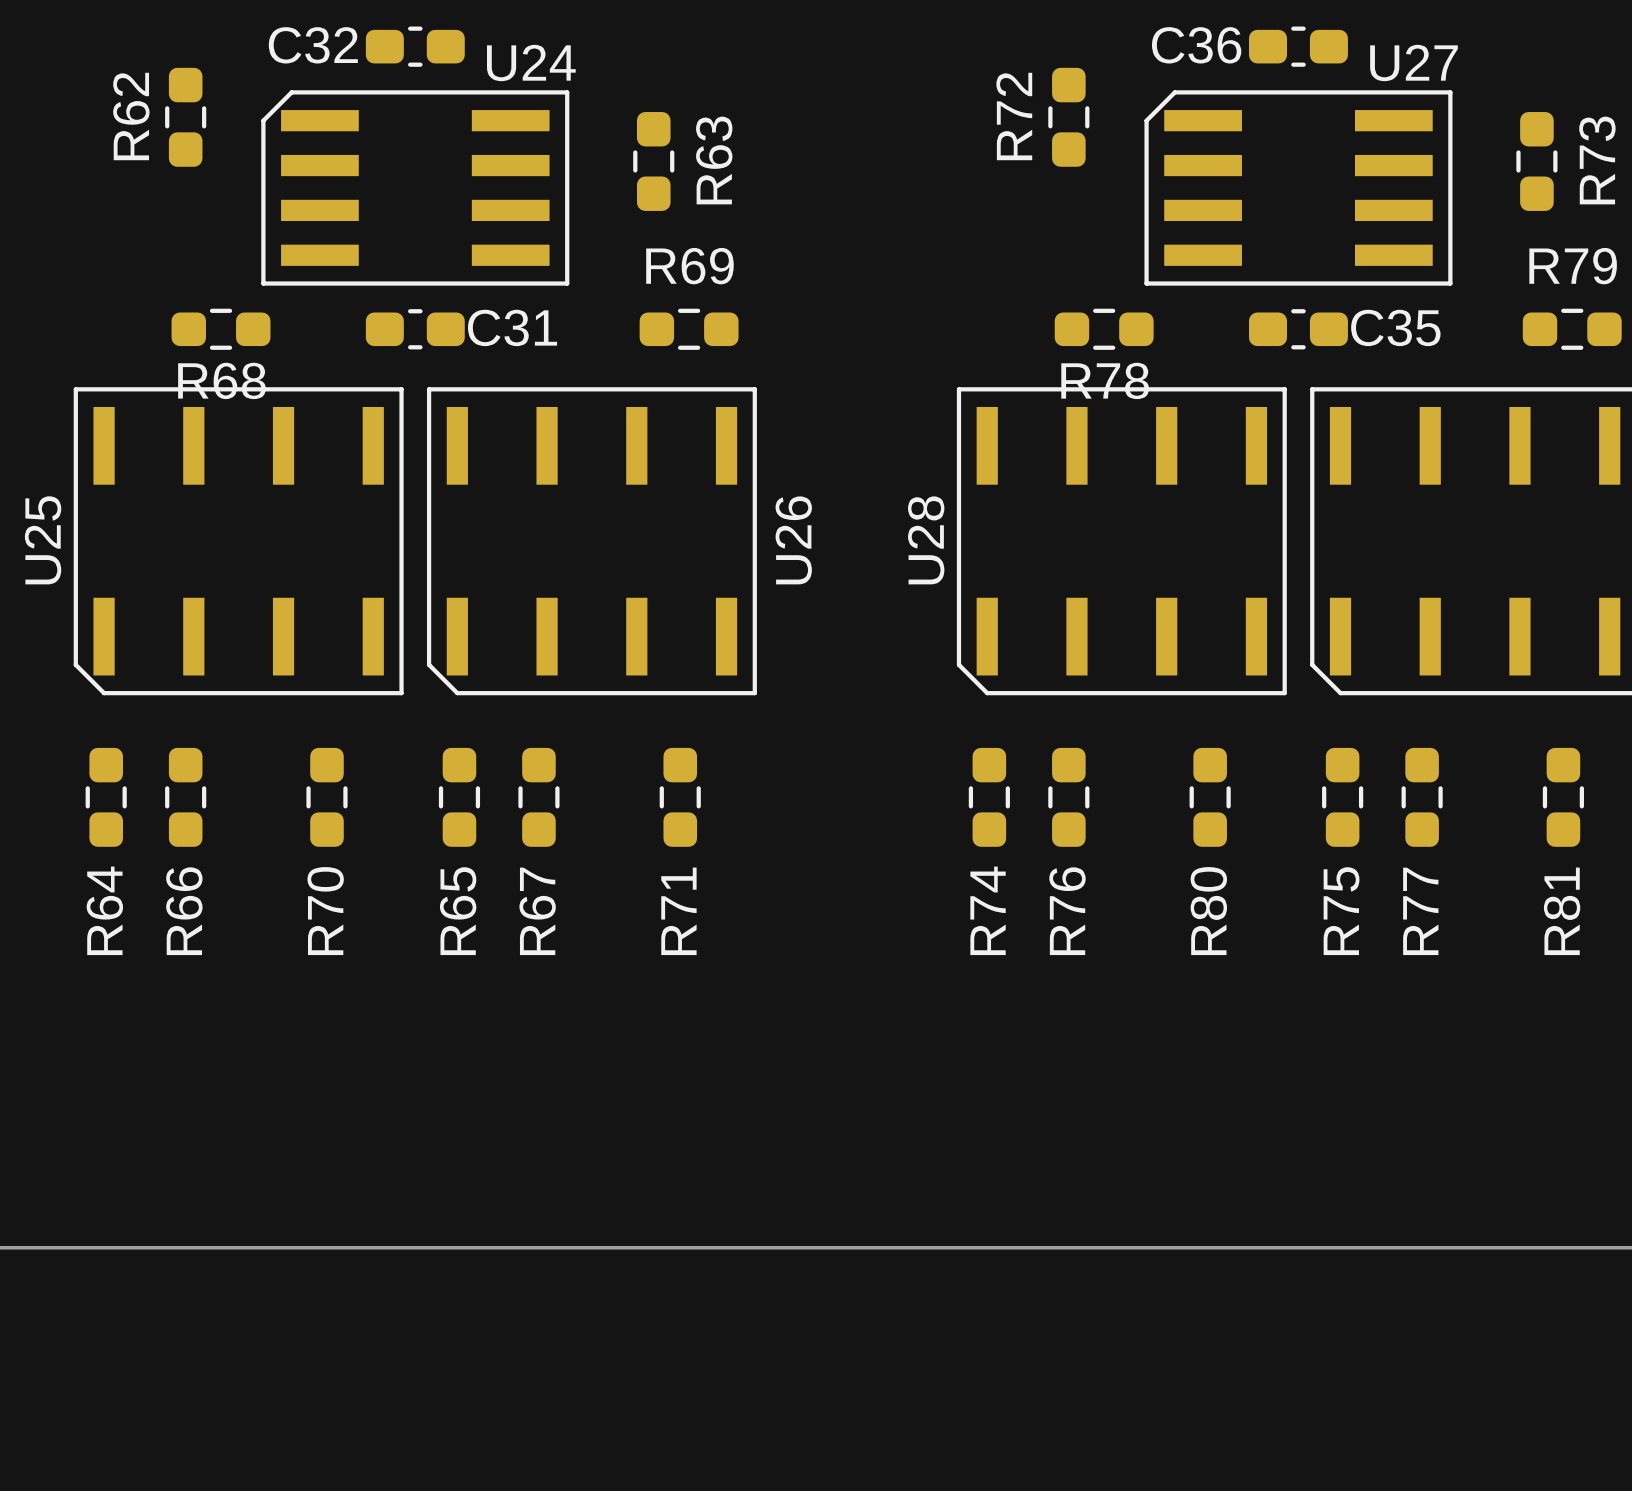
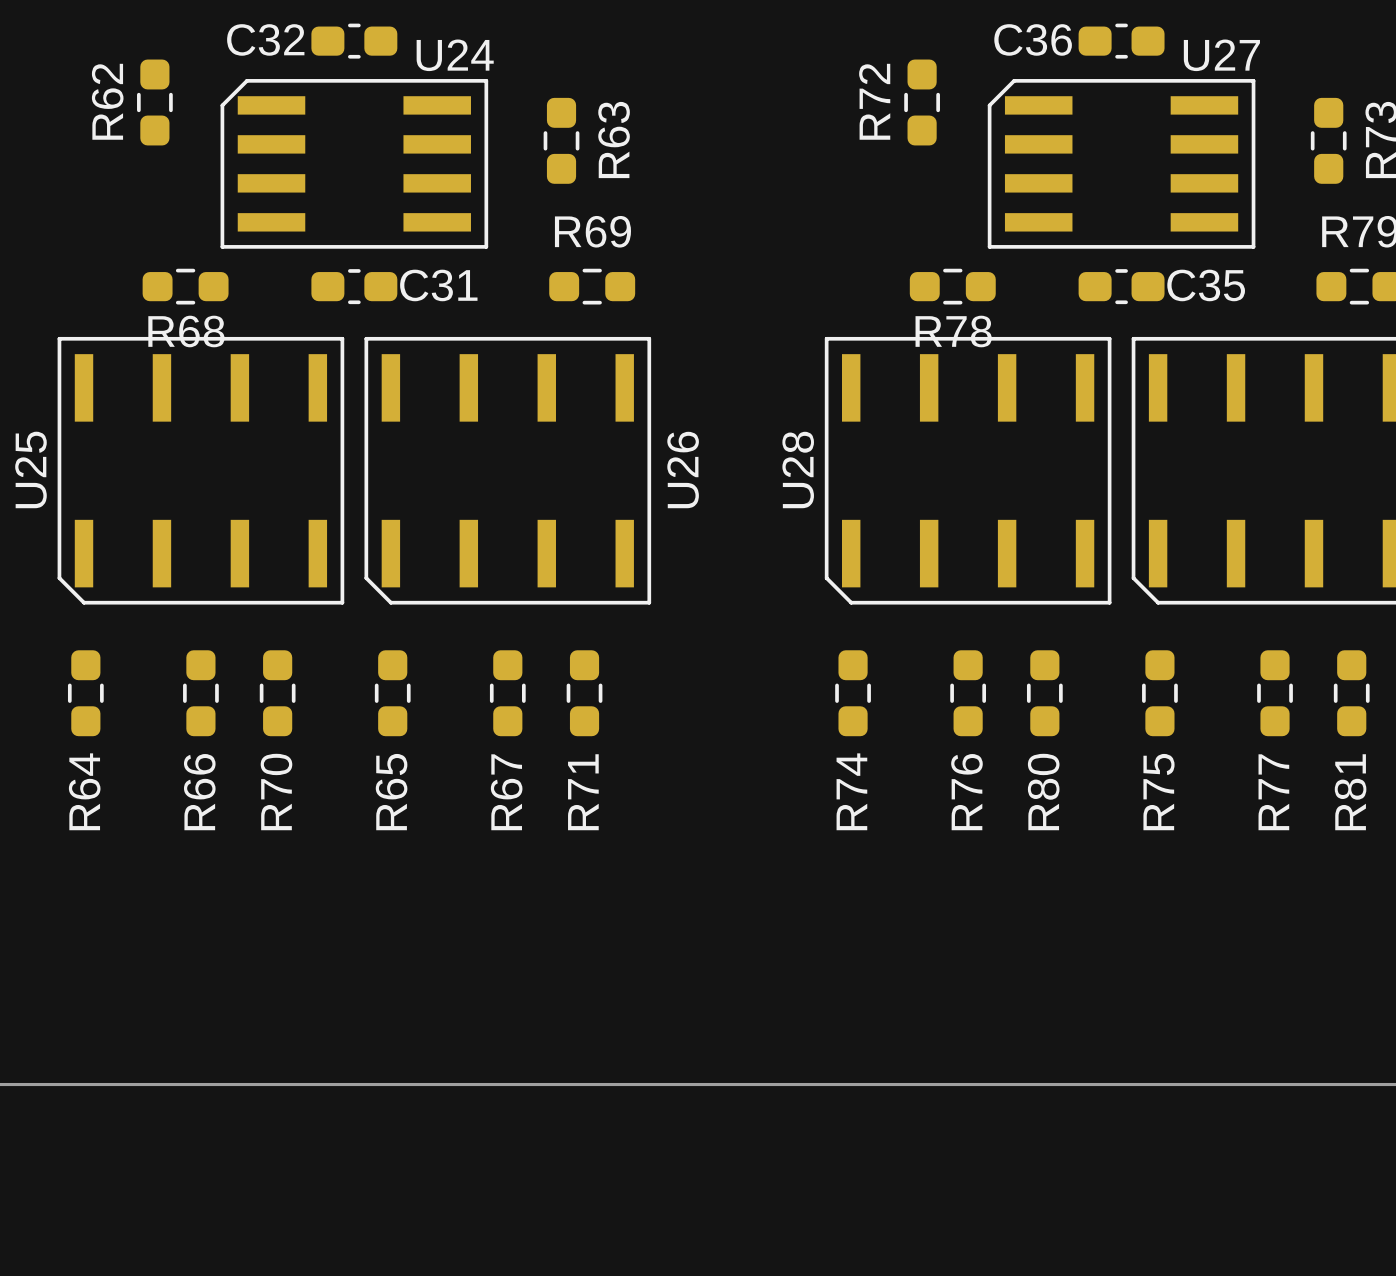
R66 position: (185, 797) -> (200, 693)
R67 position: (538, 797) -> (507, 693)
R76 position: (1068, 797) -> (968, 693)
R77 position: (1422, 797) -> (1275, 693)

